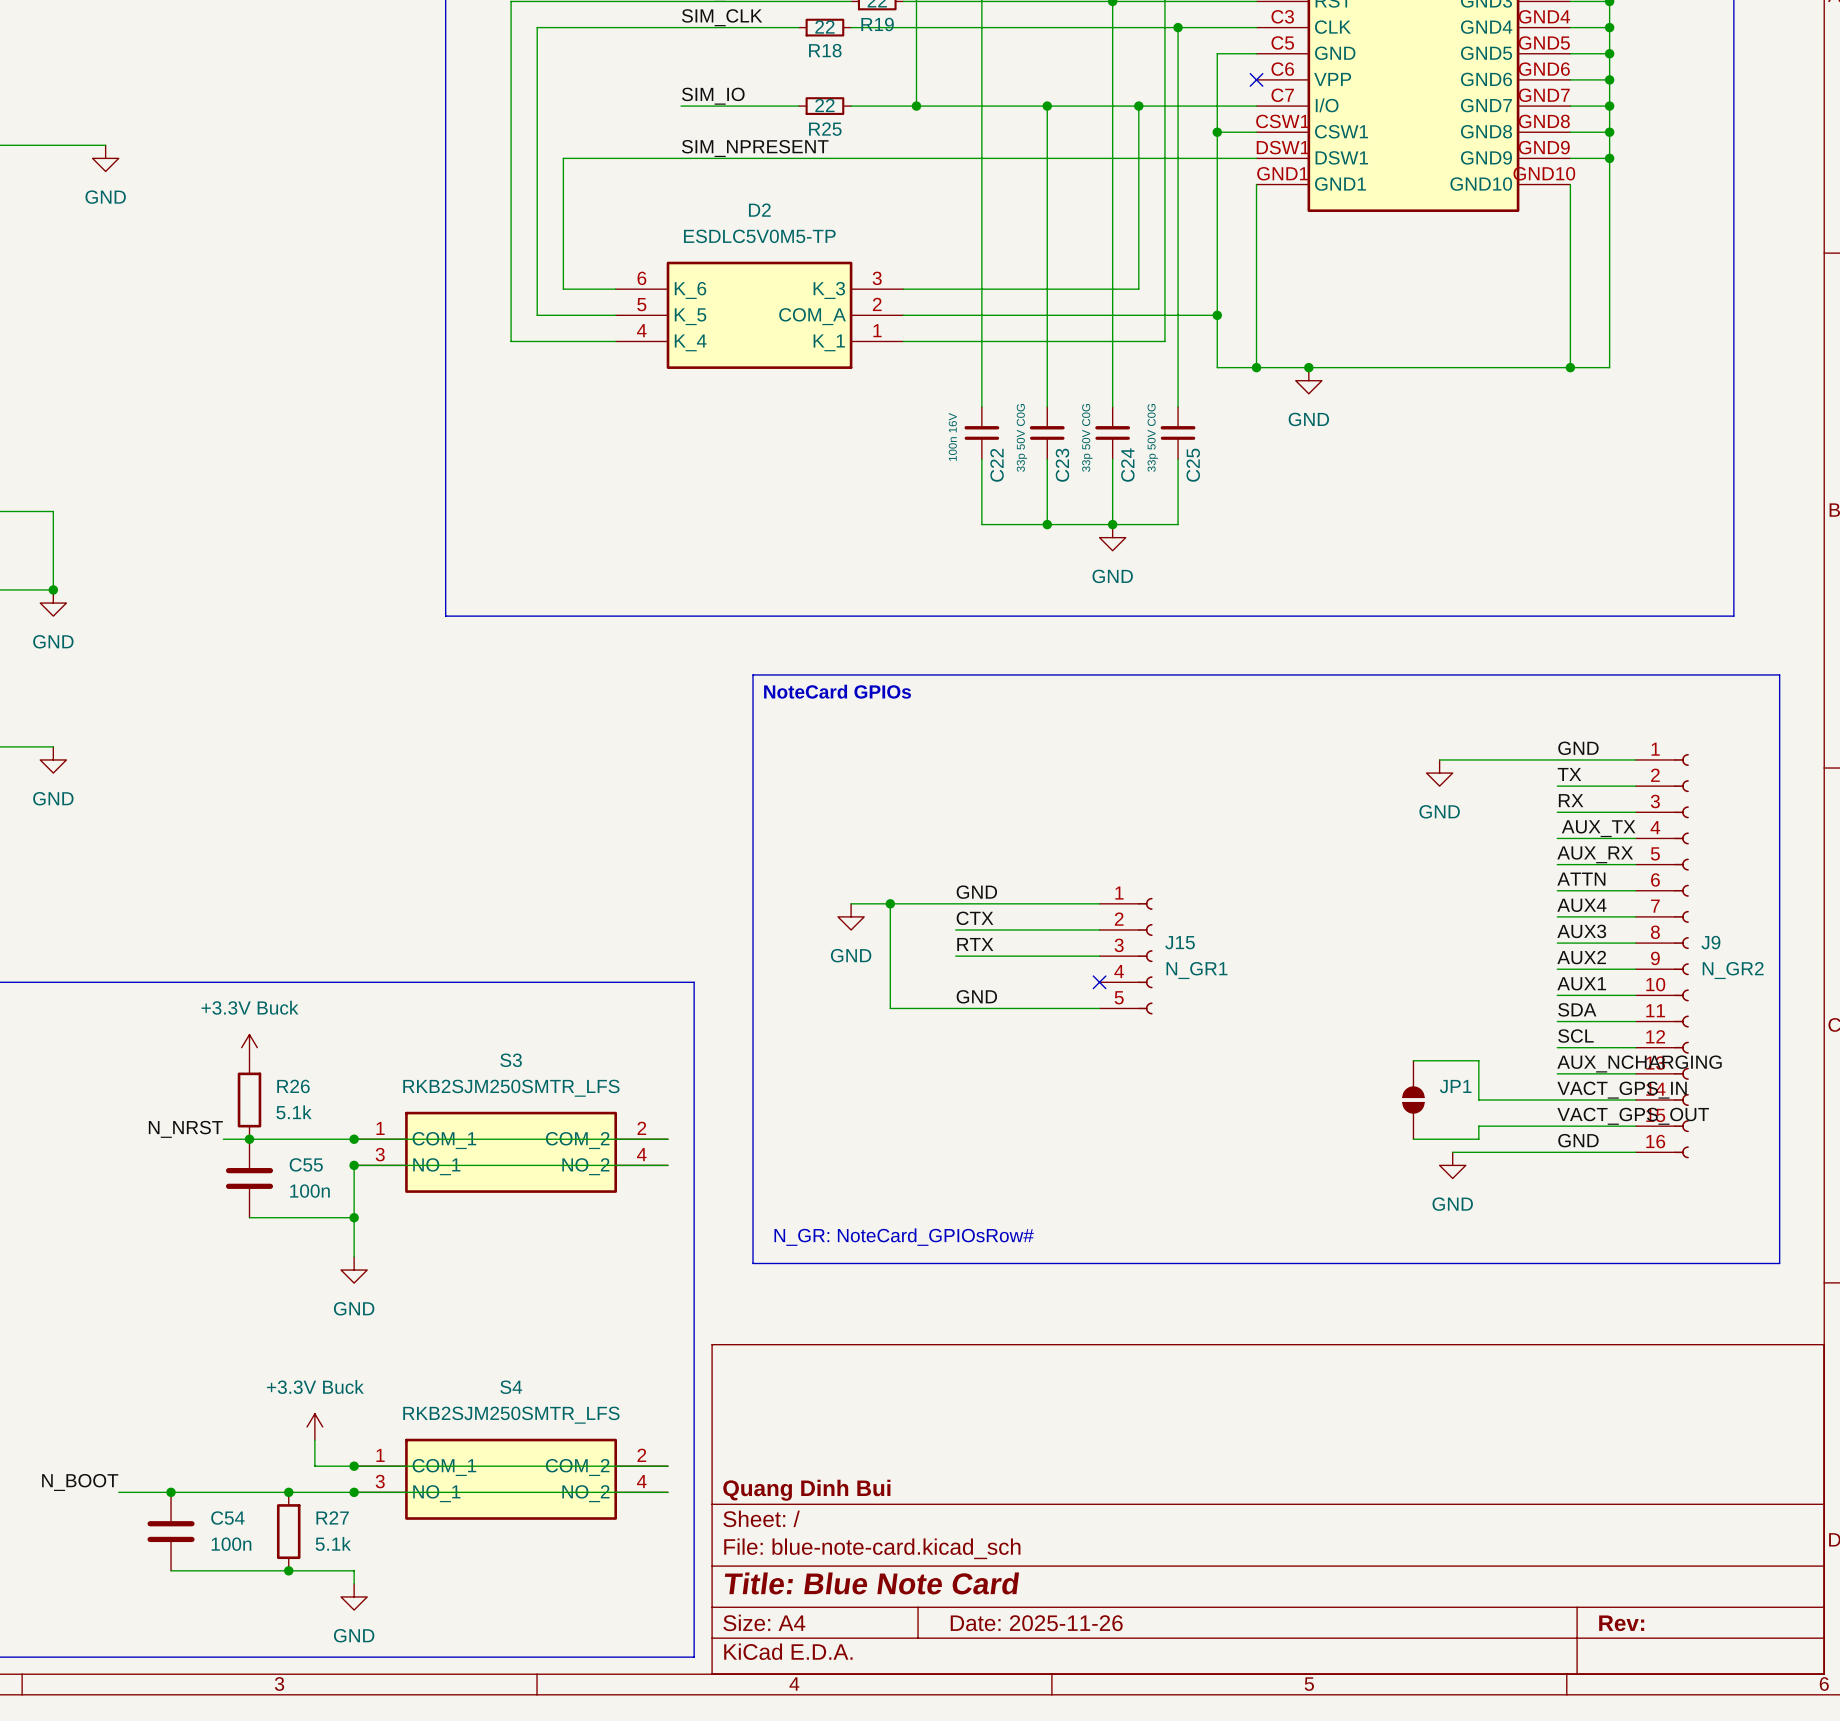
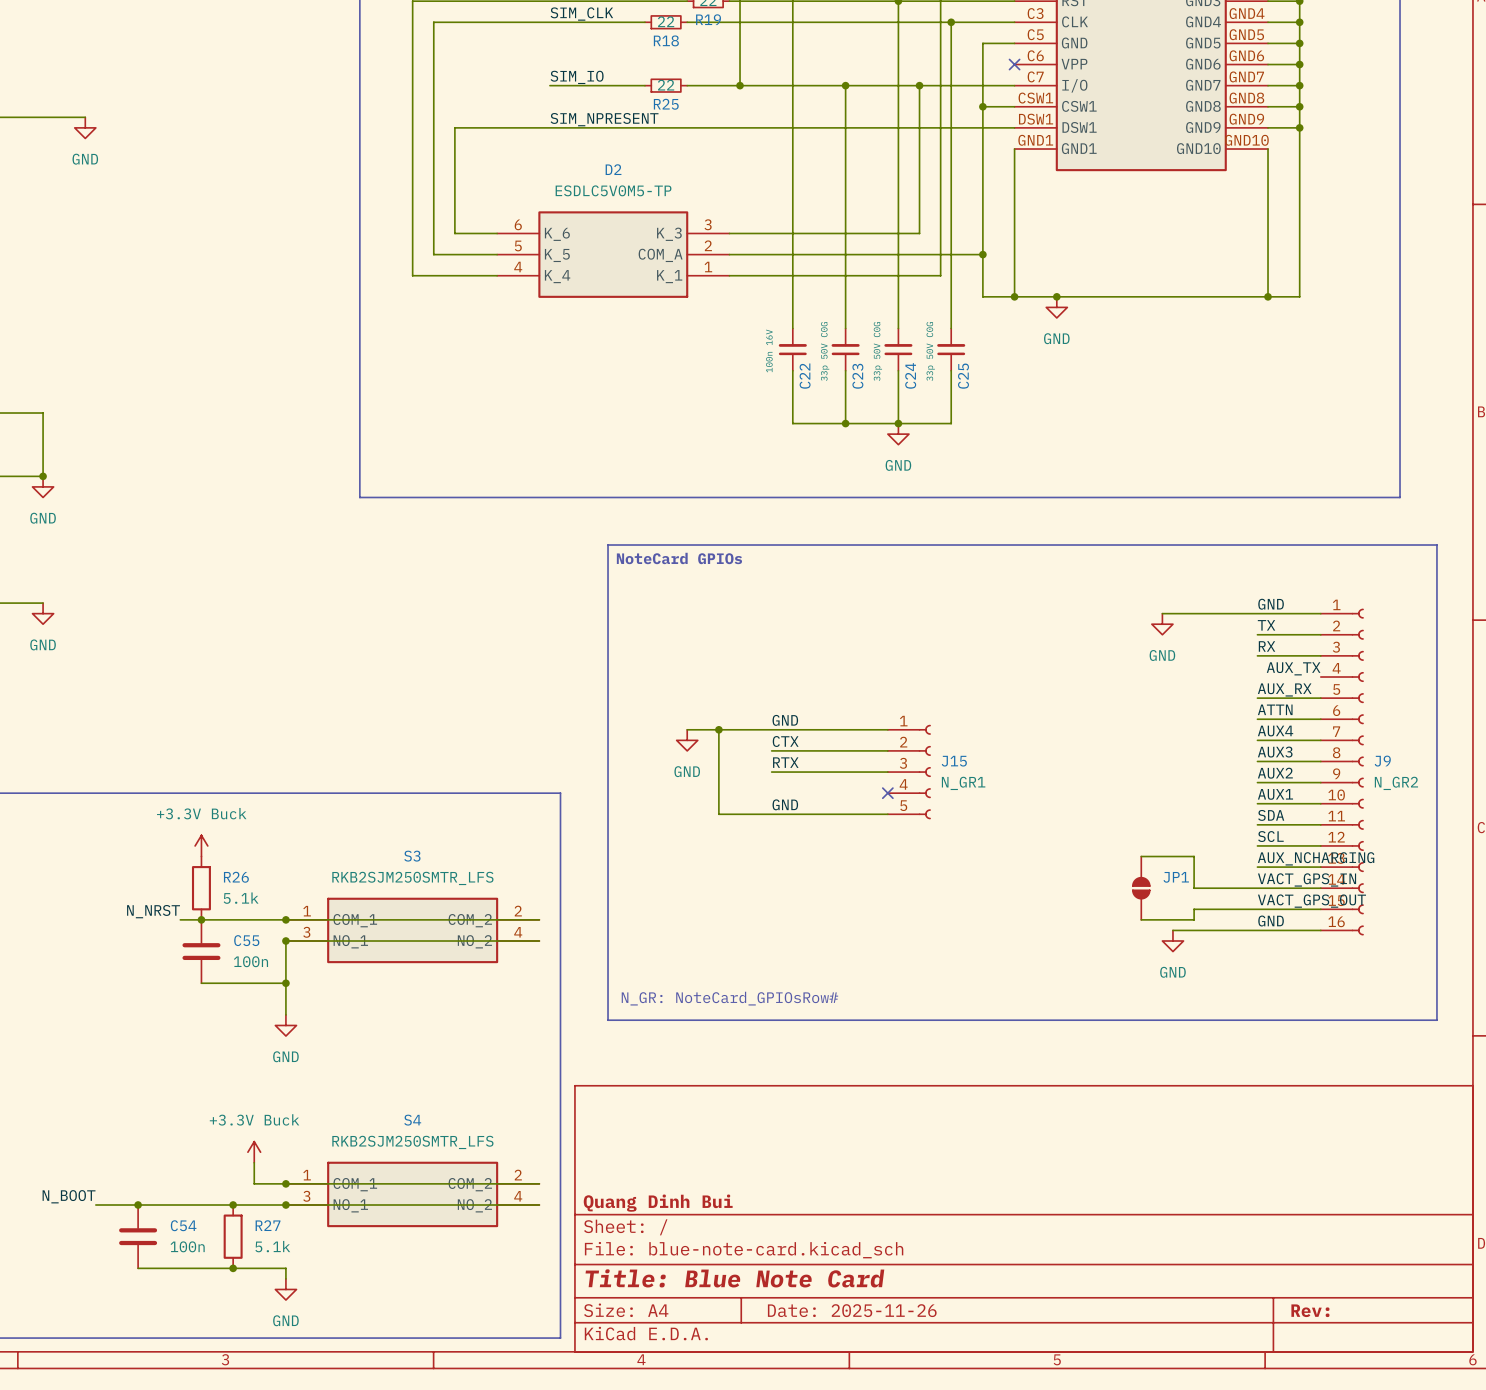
wire: (1557, 838) (1635, 838) -> none

